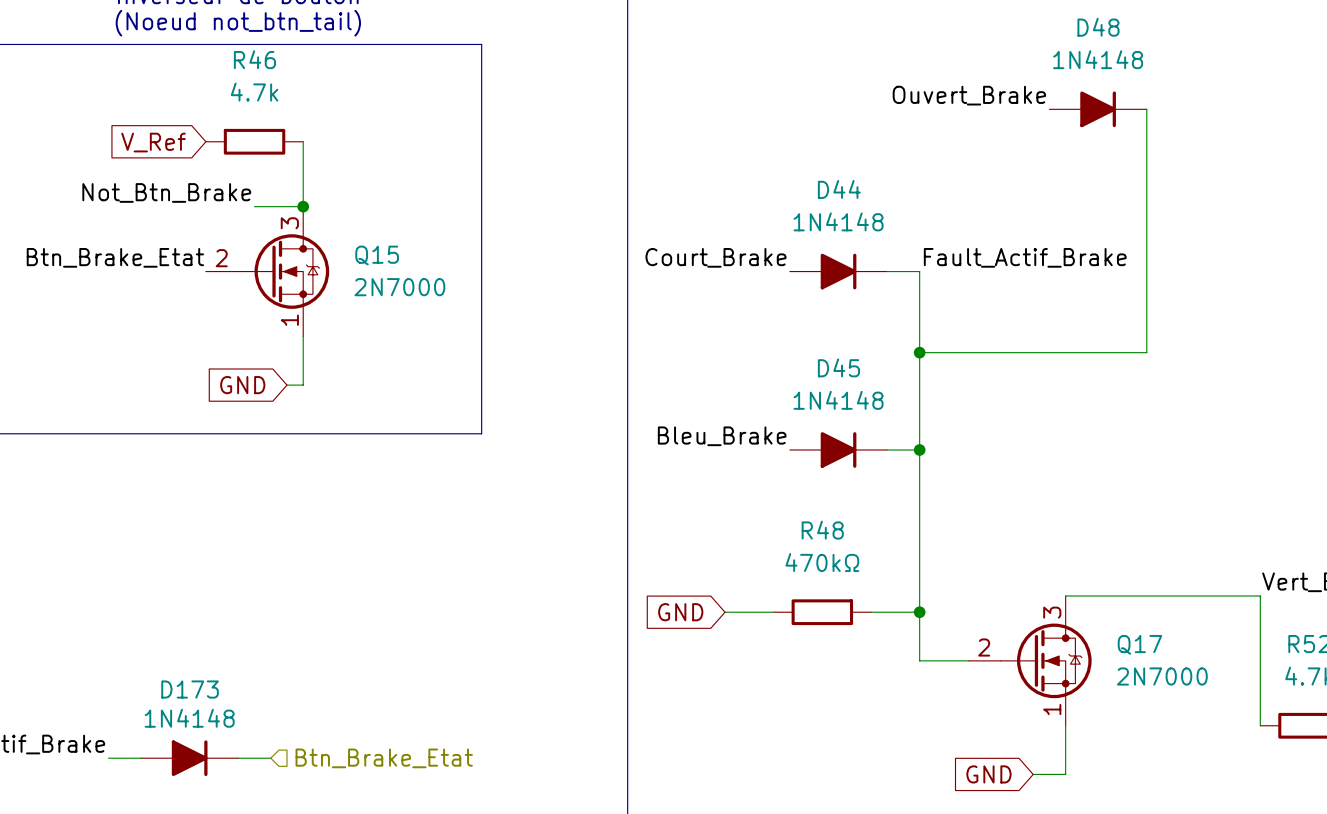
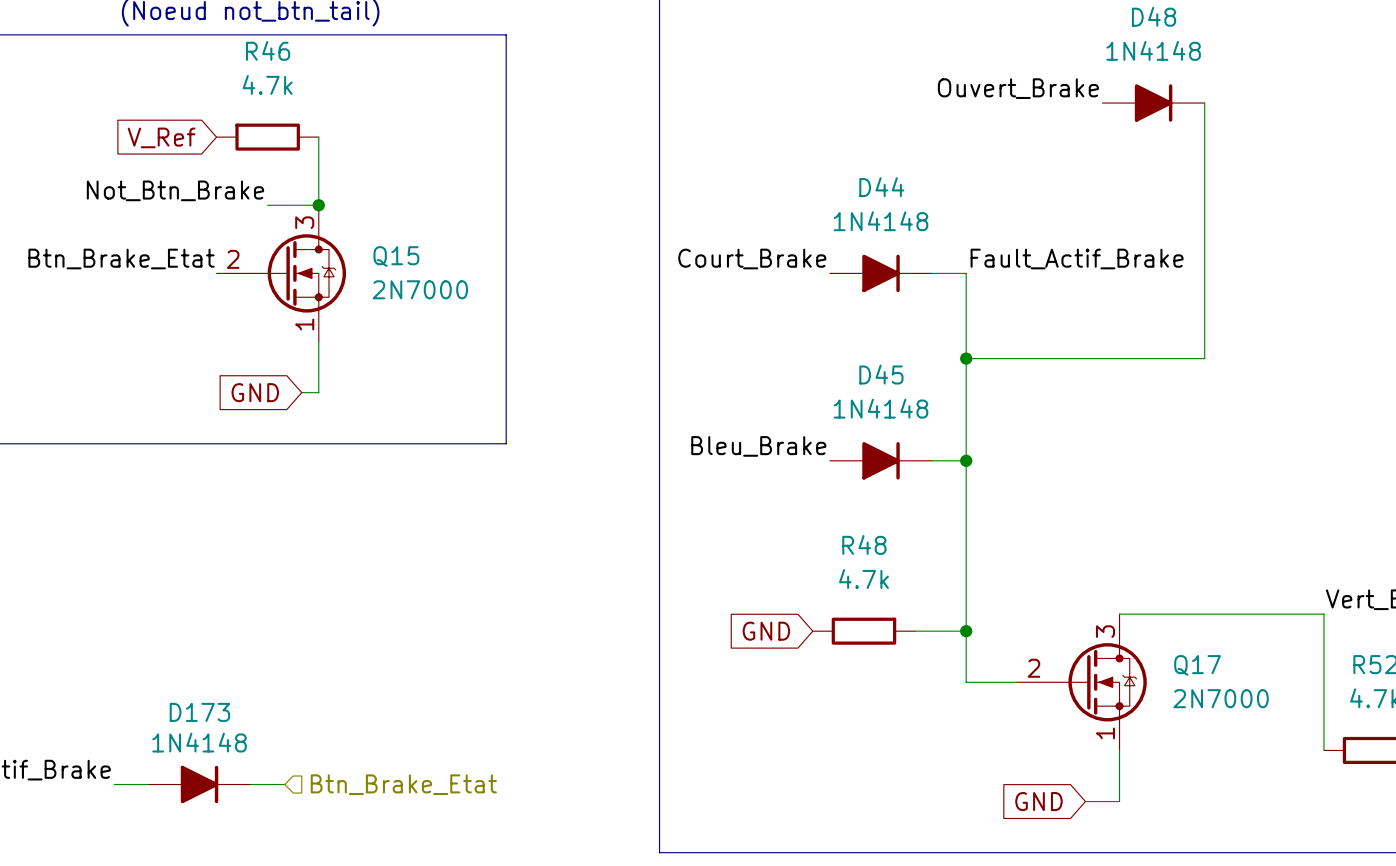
R48 value: 470kΩ (822, 562) -> 4.7k (863, 579)
global label position: GND (680, 612) -> GND (766, 631)
wire: (724, 612) (773, 612) -> none

